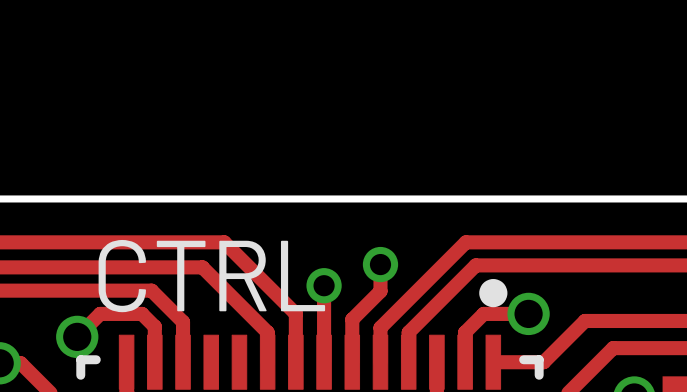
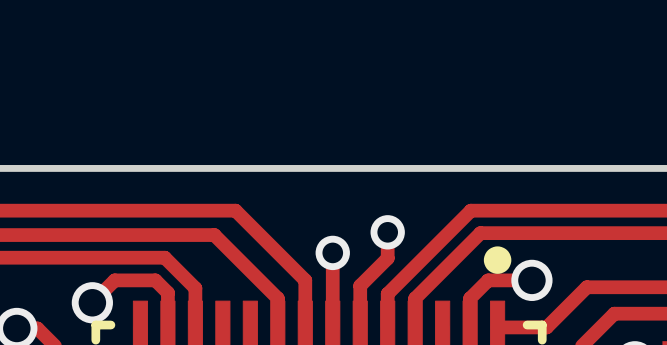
text: CTRL (211, 276) -> none

